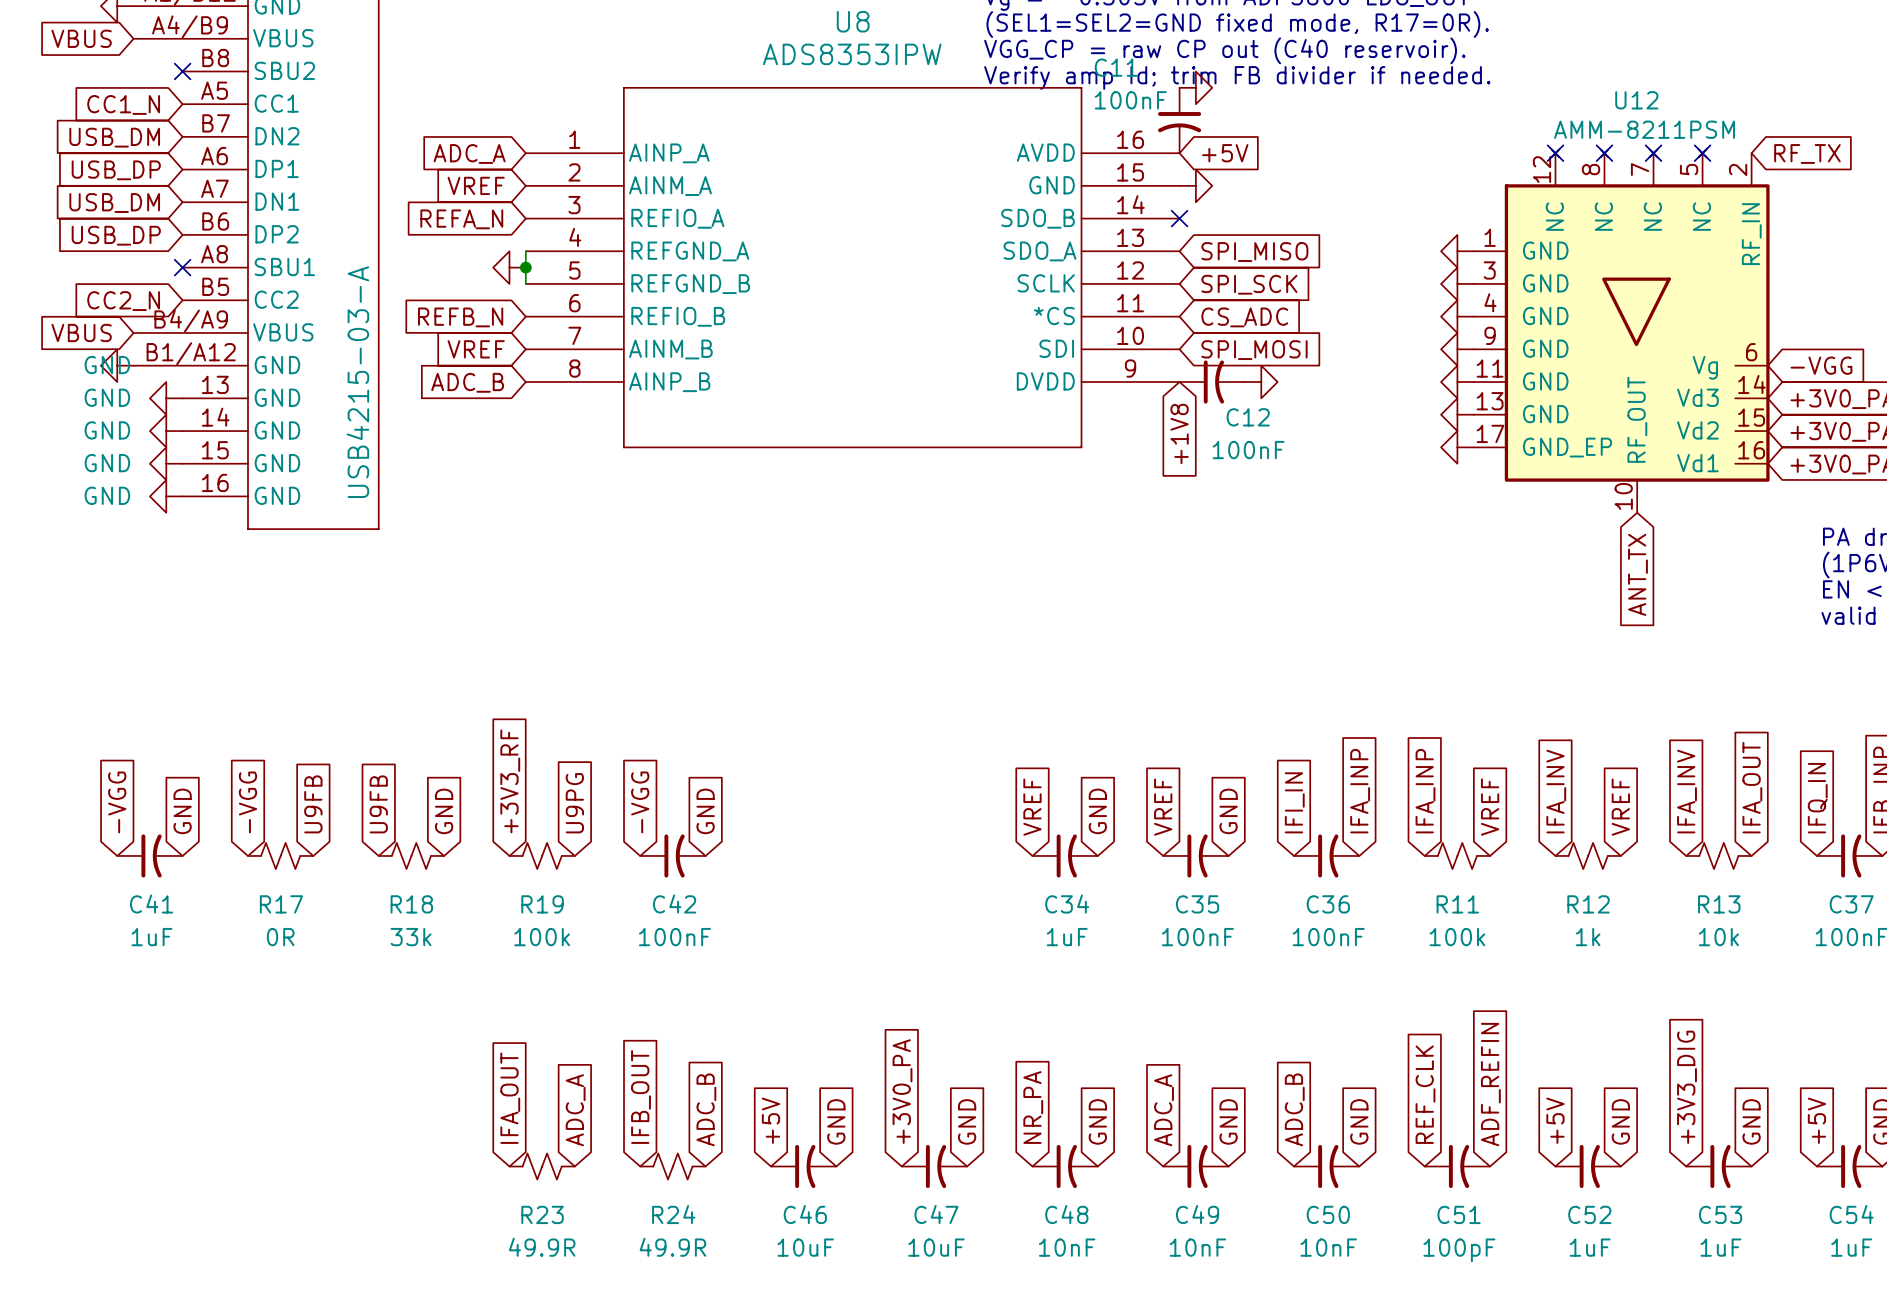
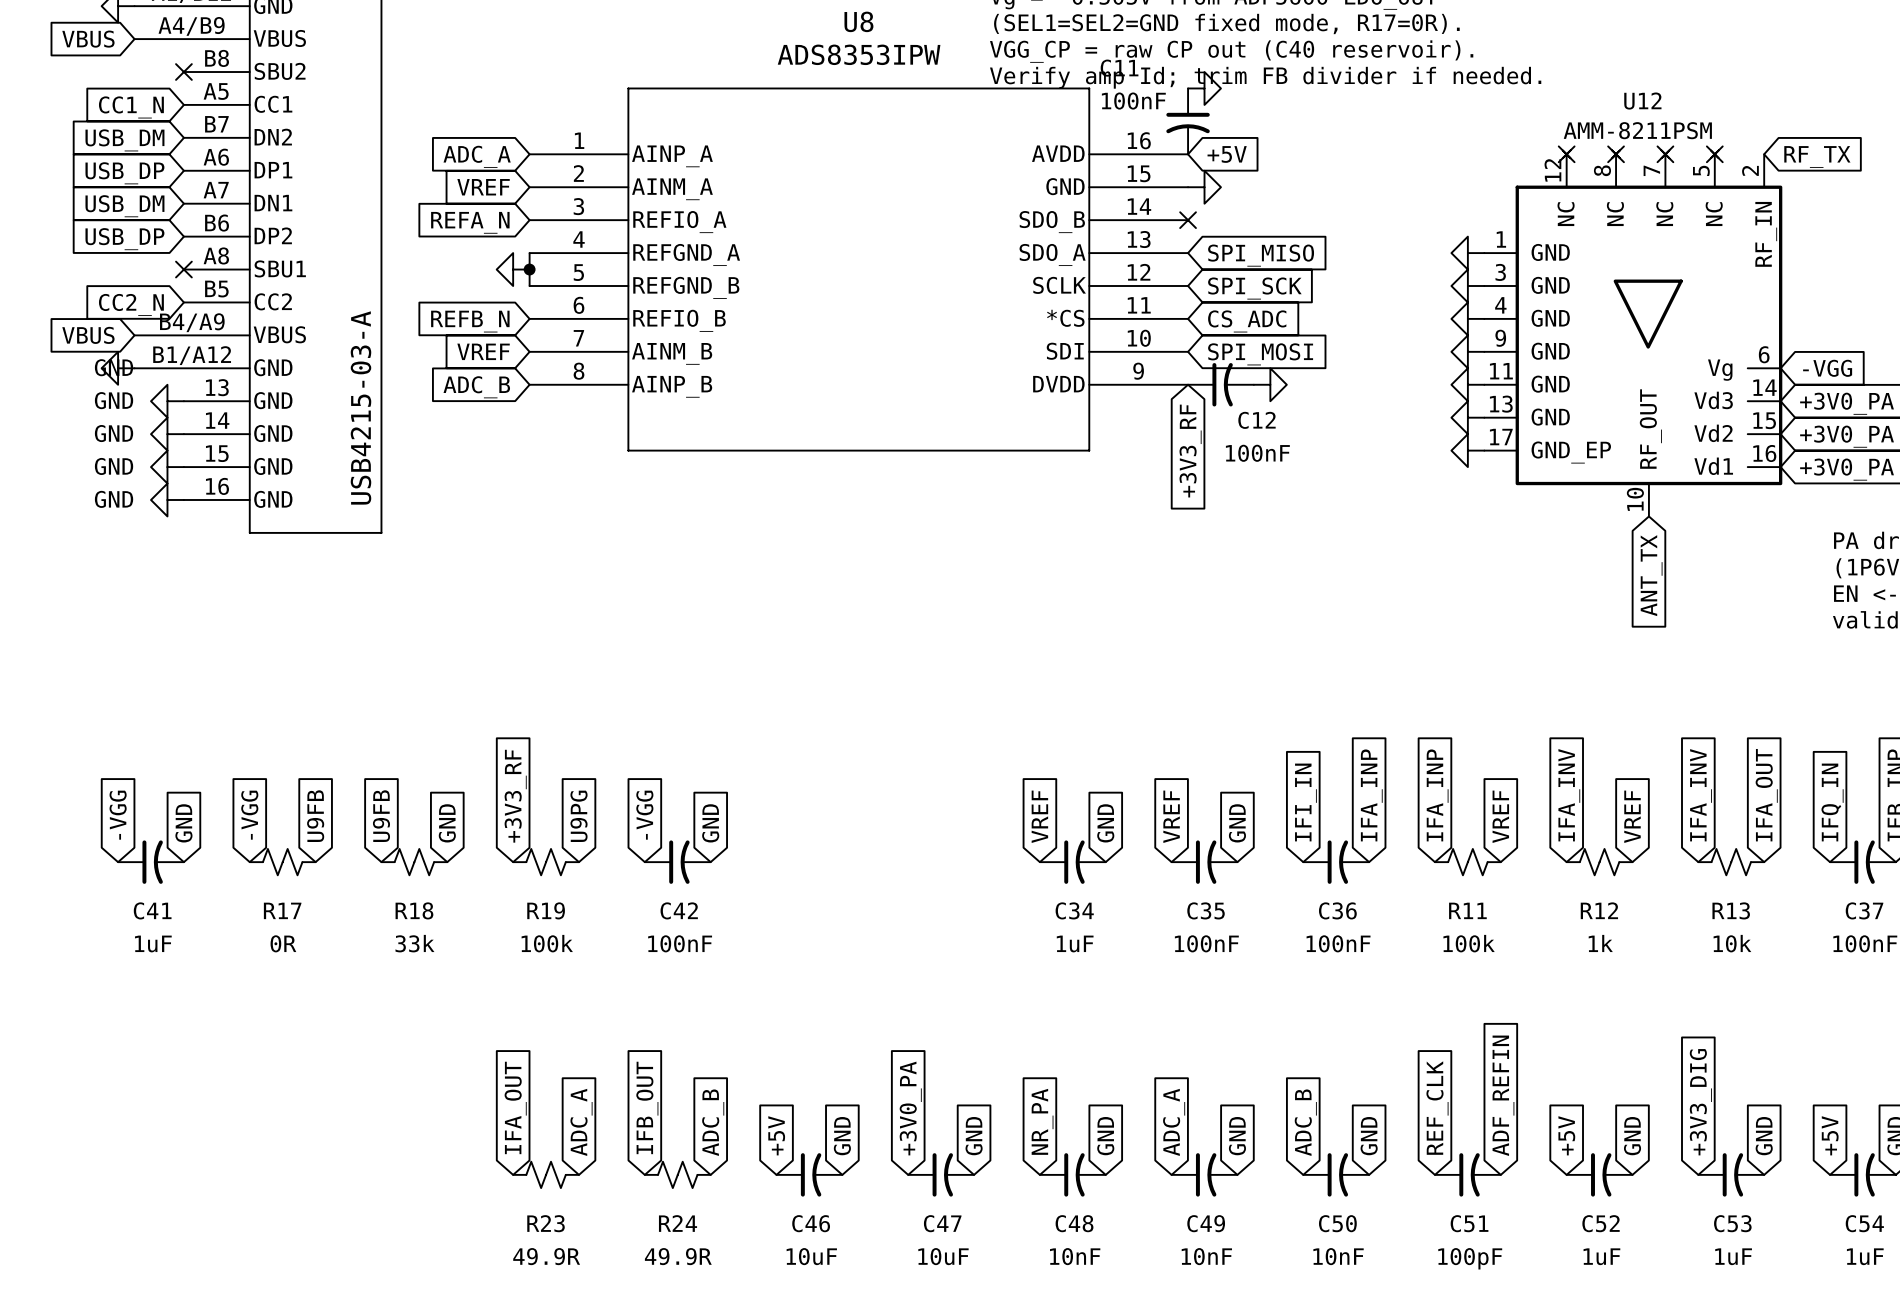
global label: +1V8 (1179, 433) -> +3V3_RF (1190, 451)

